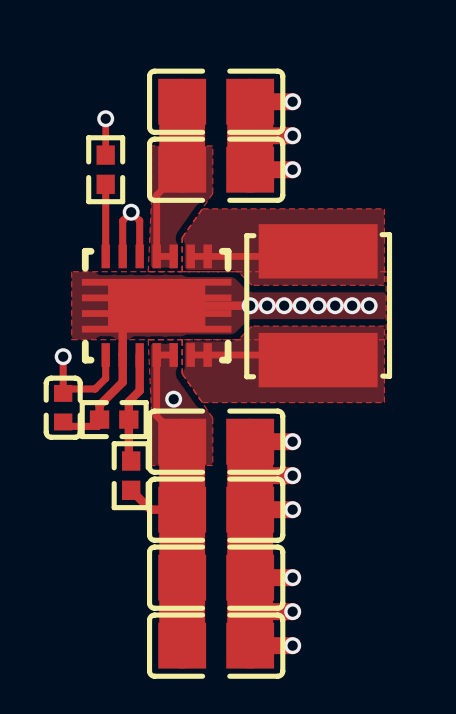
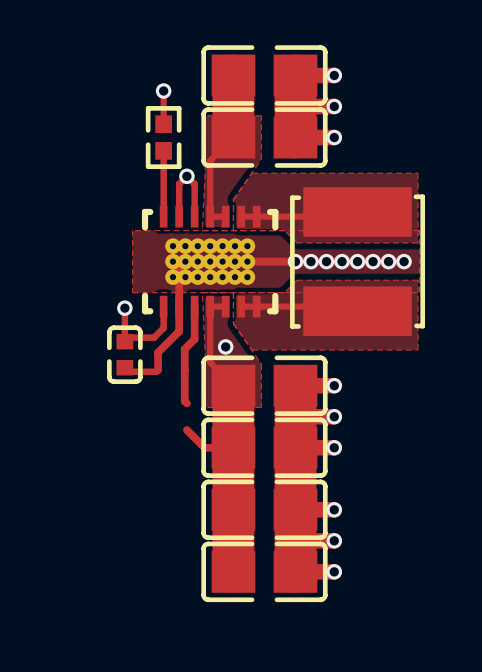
part footprint: [81, 244, 232, 377] -> [141, 205, 279, 327]
part: (114, 419) -> none
part: (131, 475) -> none

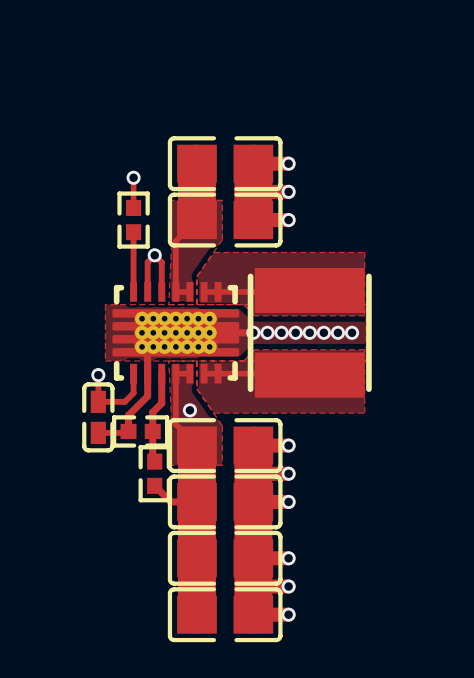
part footprint: [290, 187, 426, 337] -> [247, 267, 372, 398]
part footprint: [141, 205, 279, 327] -> [112, 282, 240, 392]
part footprint: [107, 325, 143, 385] -> [82, 382, 115, 453]
part: none -> (140, 431)
part: none -> (154, 473)

